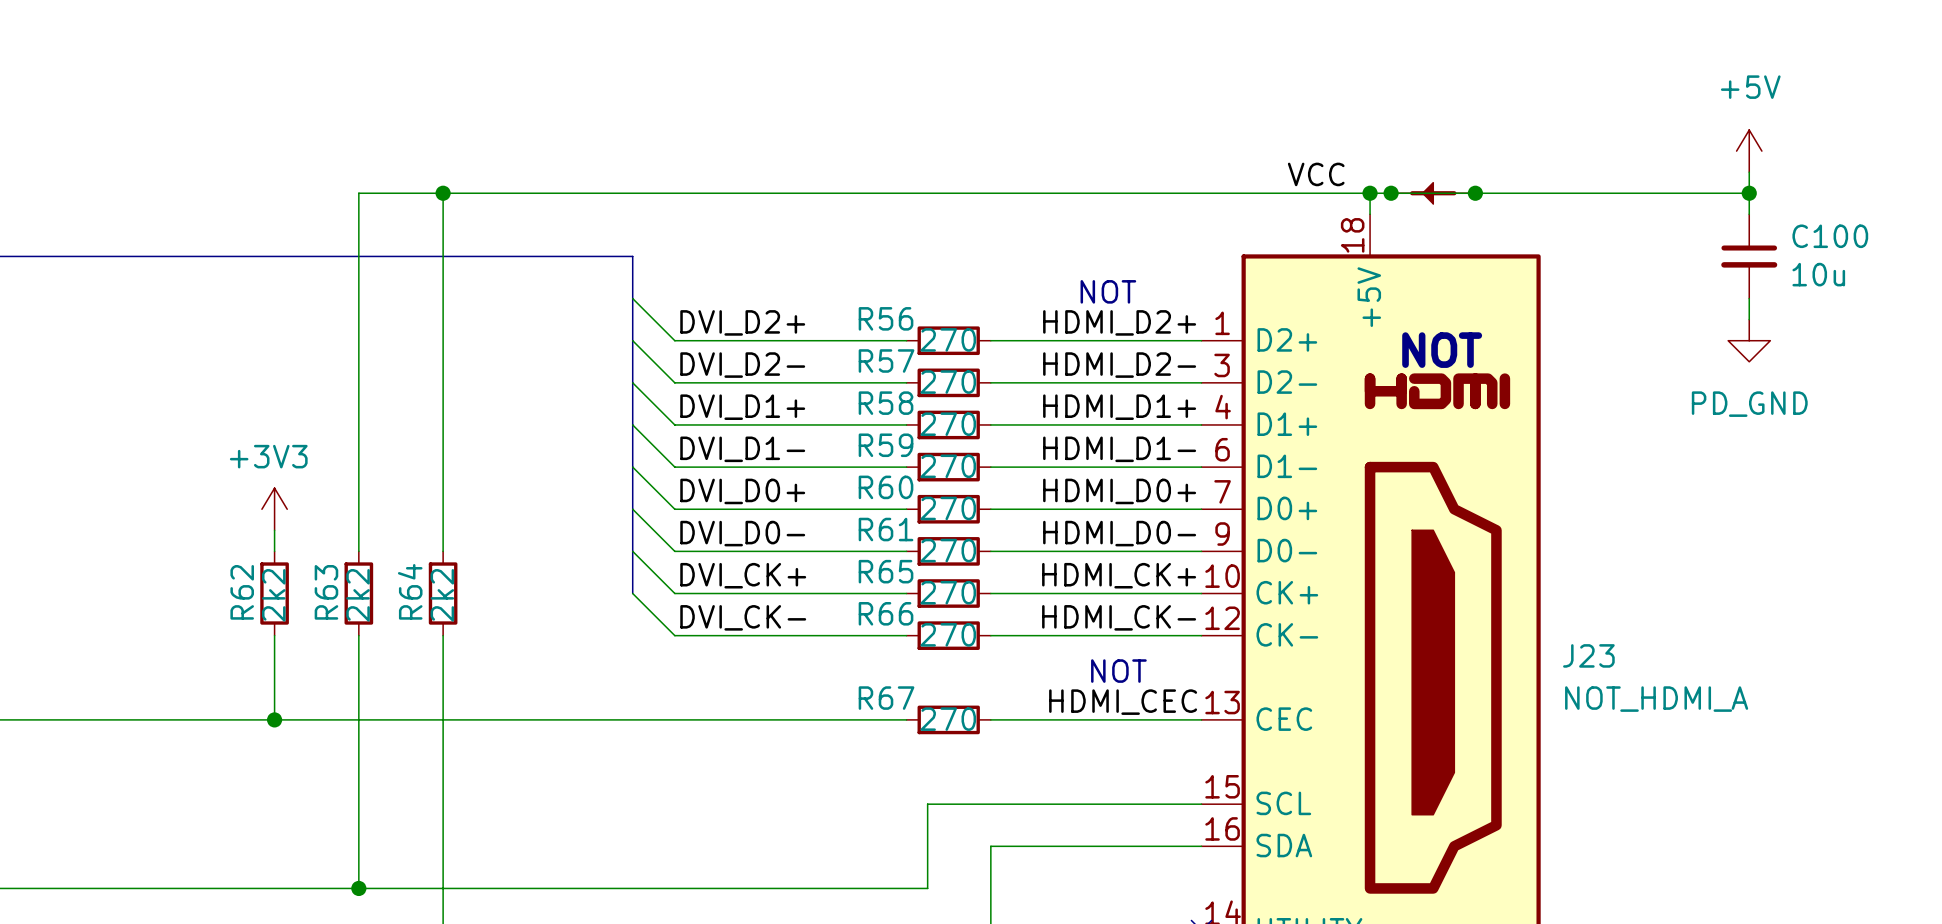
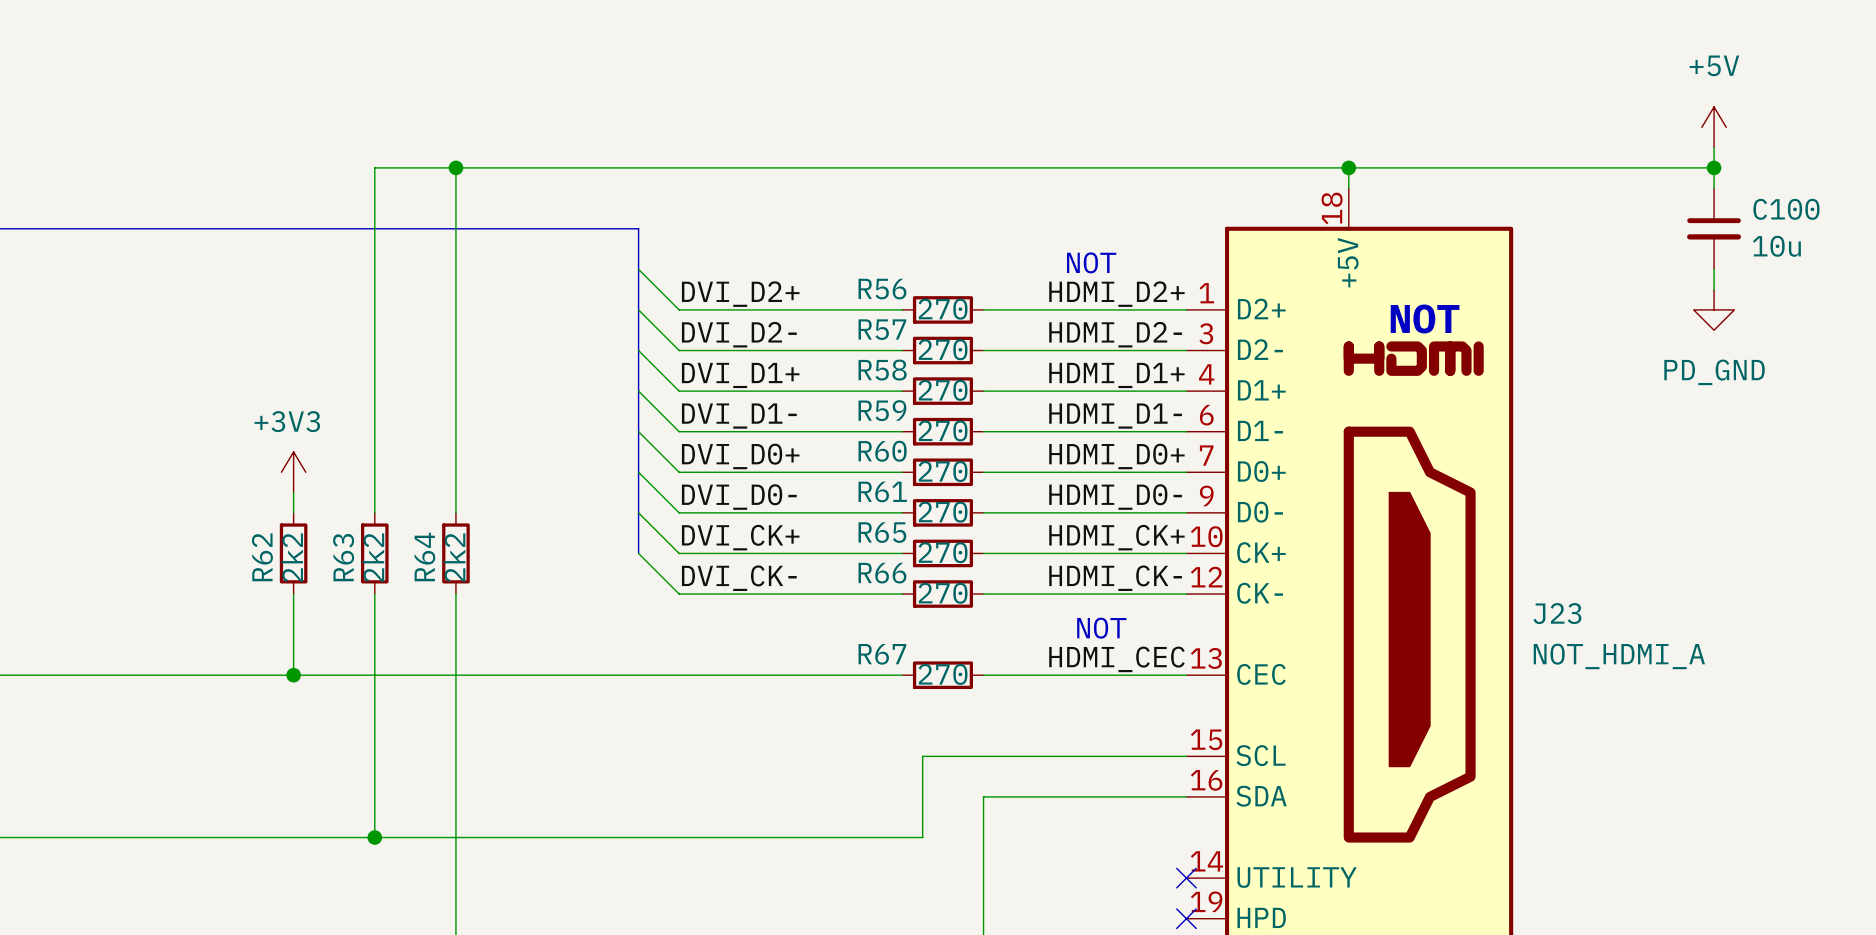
label: VCC (1316, 174) -> none
junction: (1391, 193) -> none
part: (1433, 193) -> none
junction: (1475, 193) -> none

